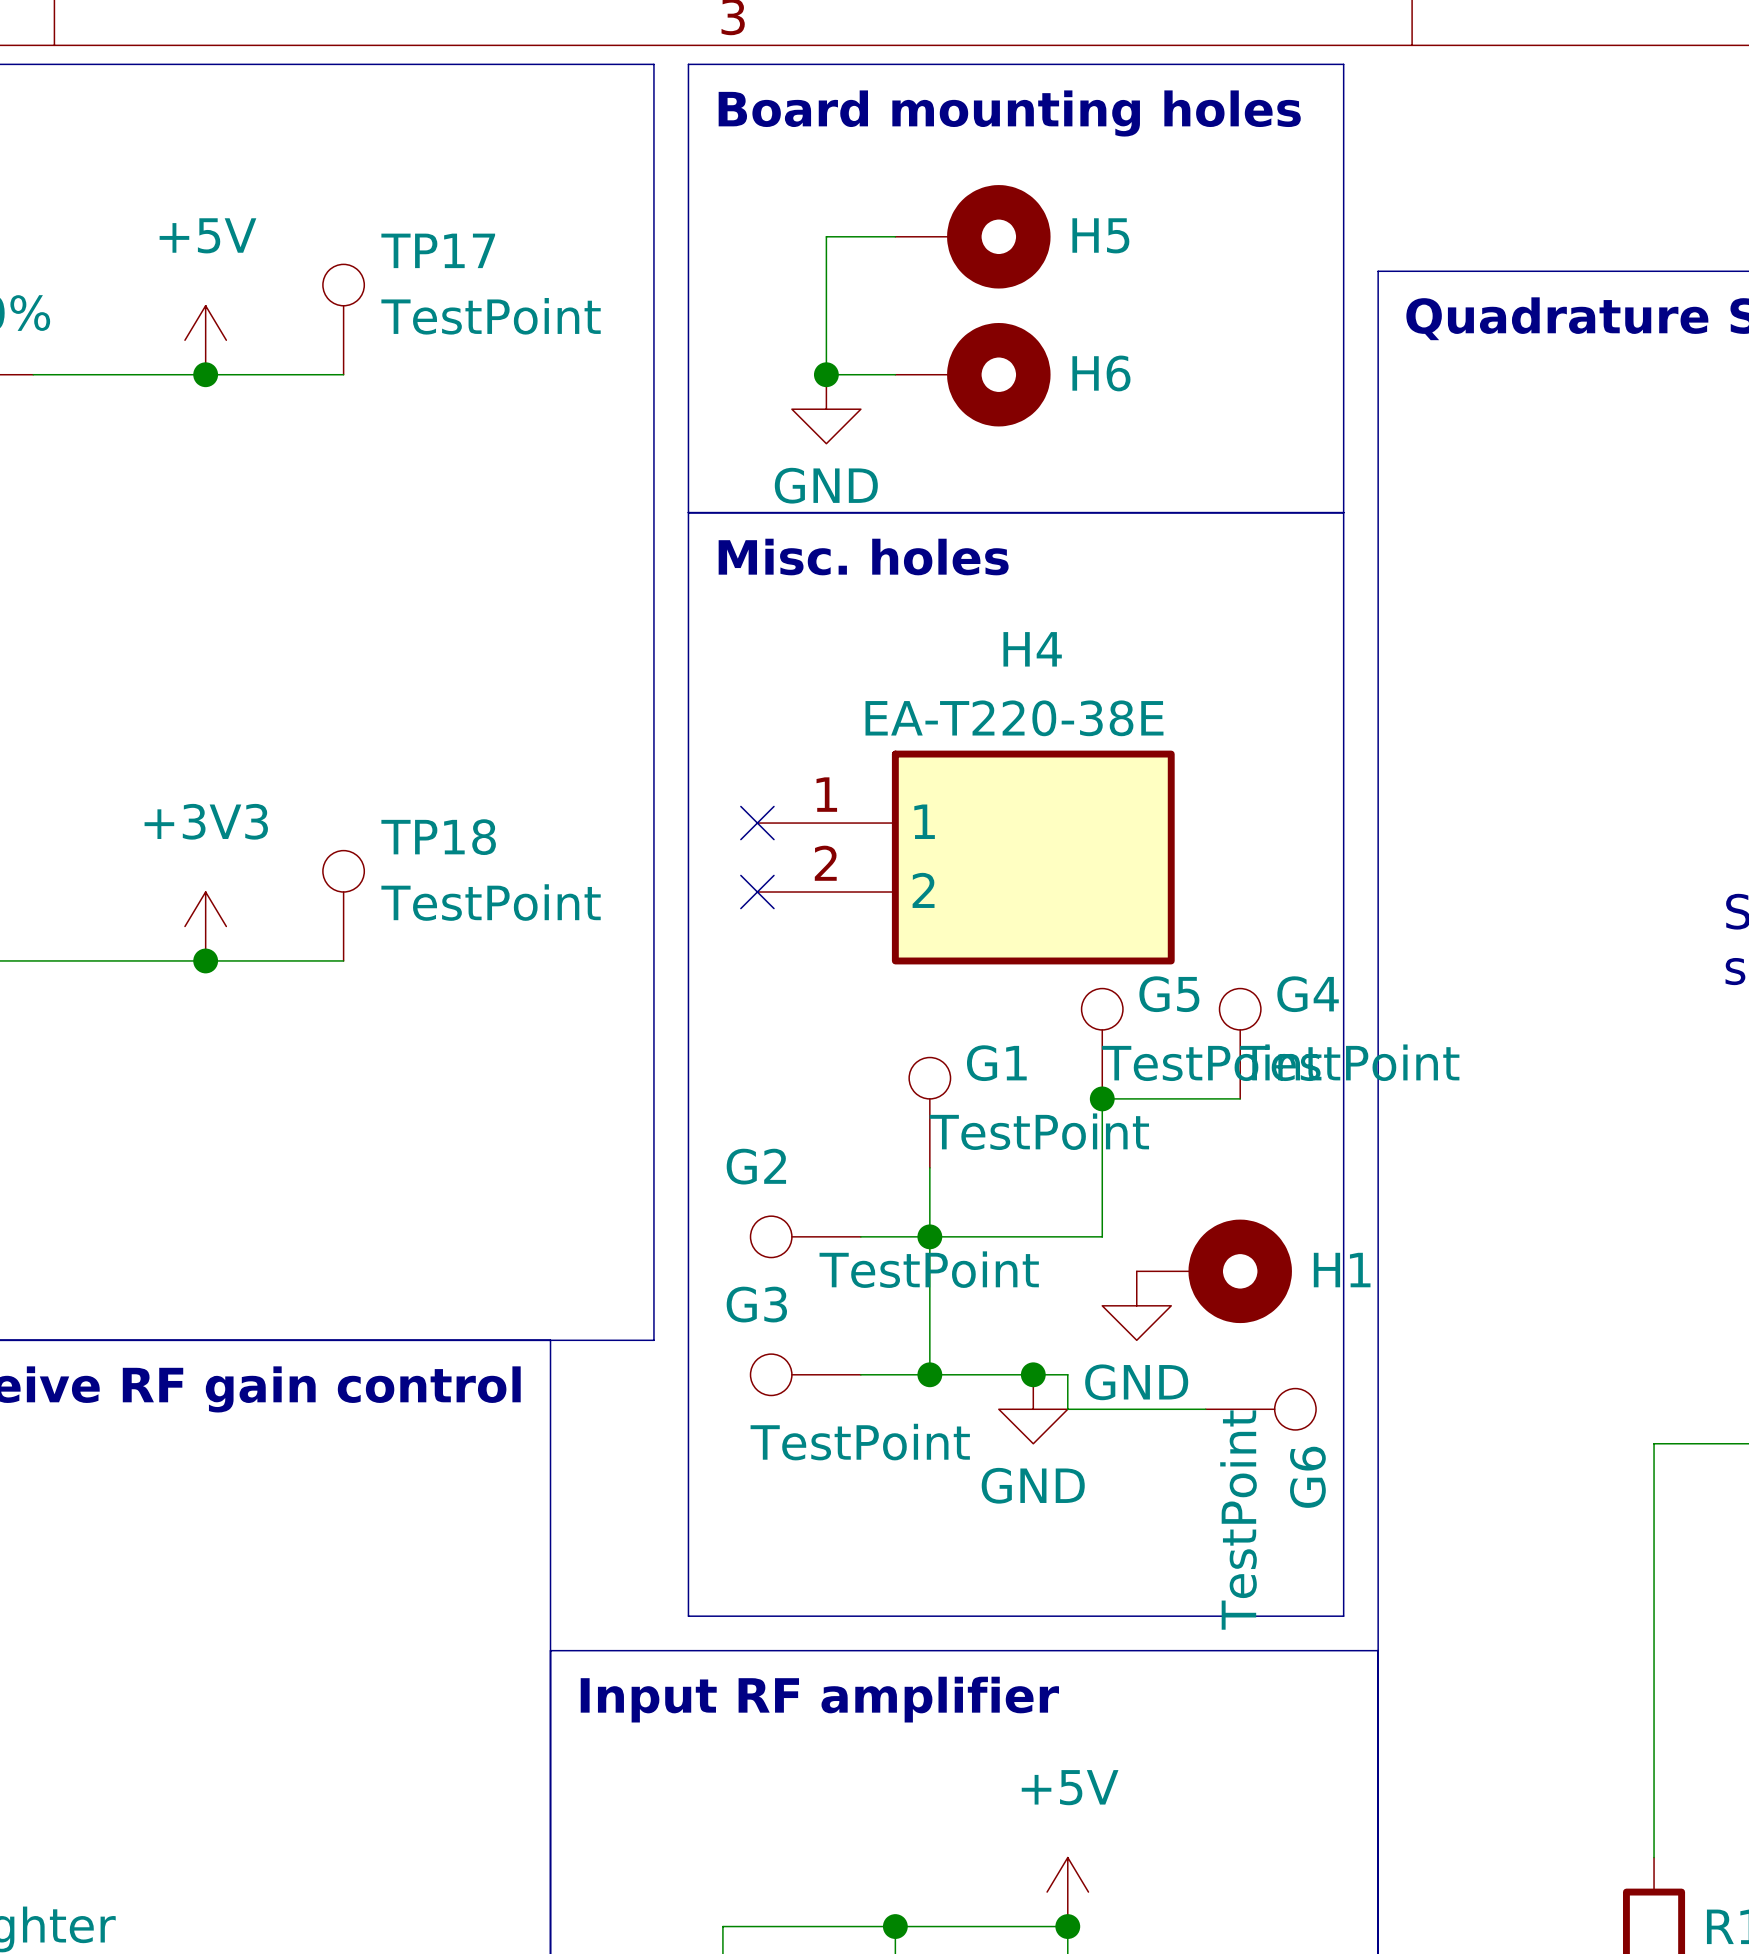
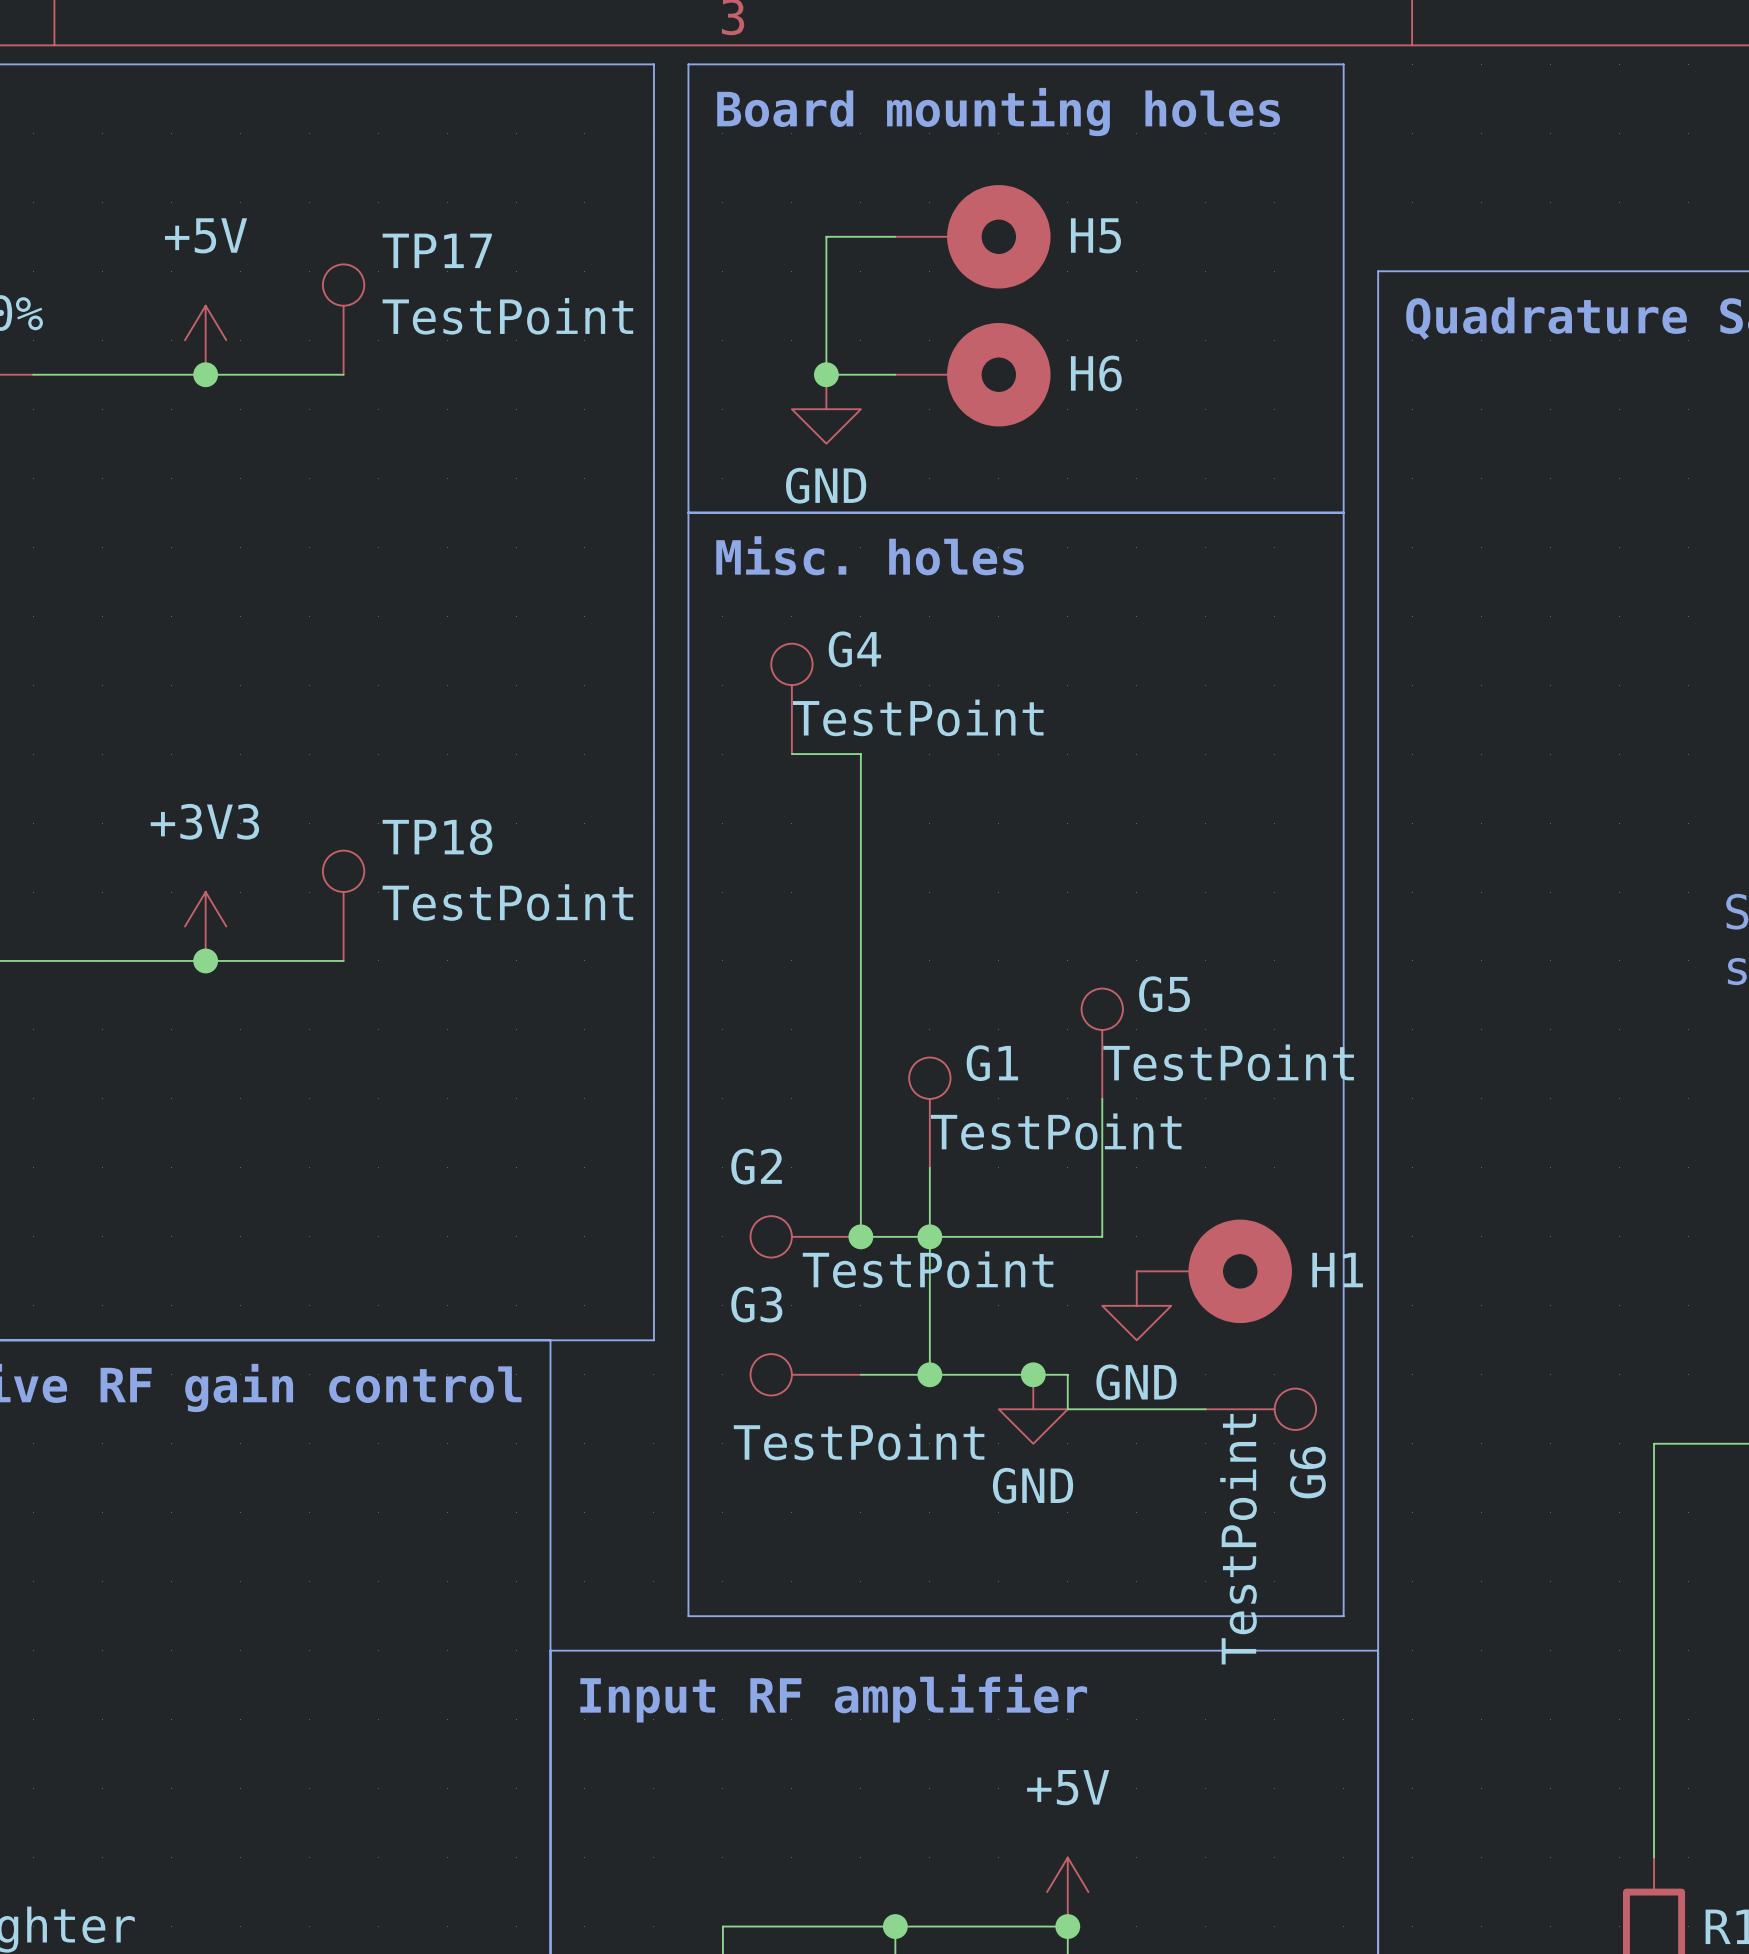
wire: none -> (791, 754) (860, 754) (860, 1236)
no-connect mark: (757, 823) -> none
H4: EA-T220-38E (966, 857) -> none
no-connect mark: (757, 892) -> none
G4 position: (1240, 1043) -> (791, 698)
wire: (1102, 1098) (1240, 1098) -> none
junction: (1102, 1098) -> none
junction: none -> (860, 1236)

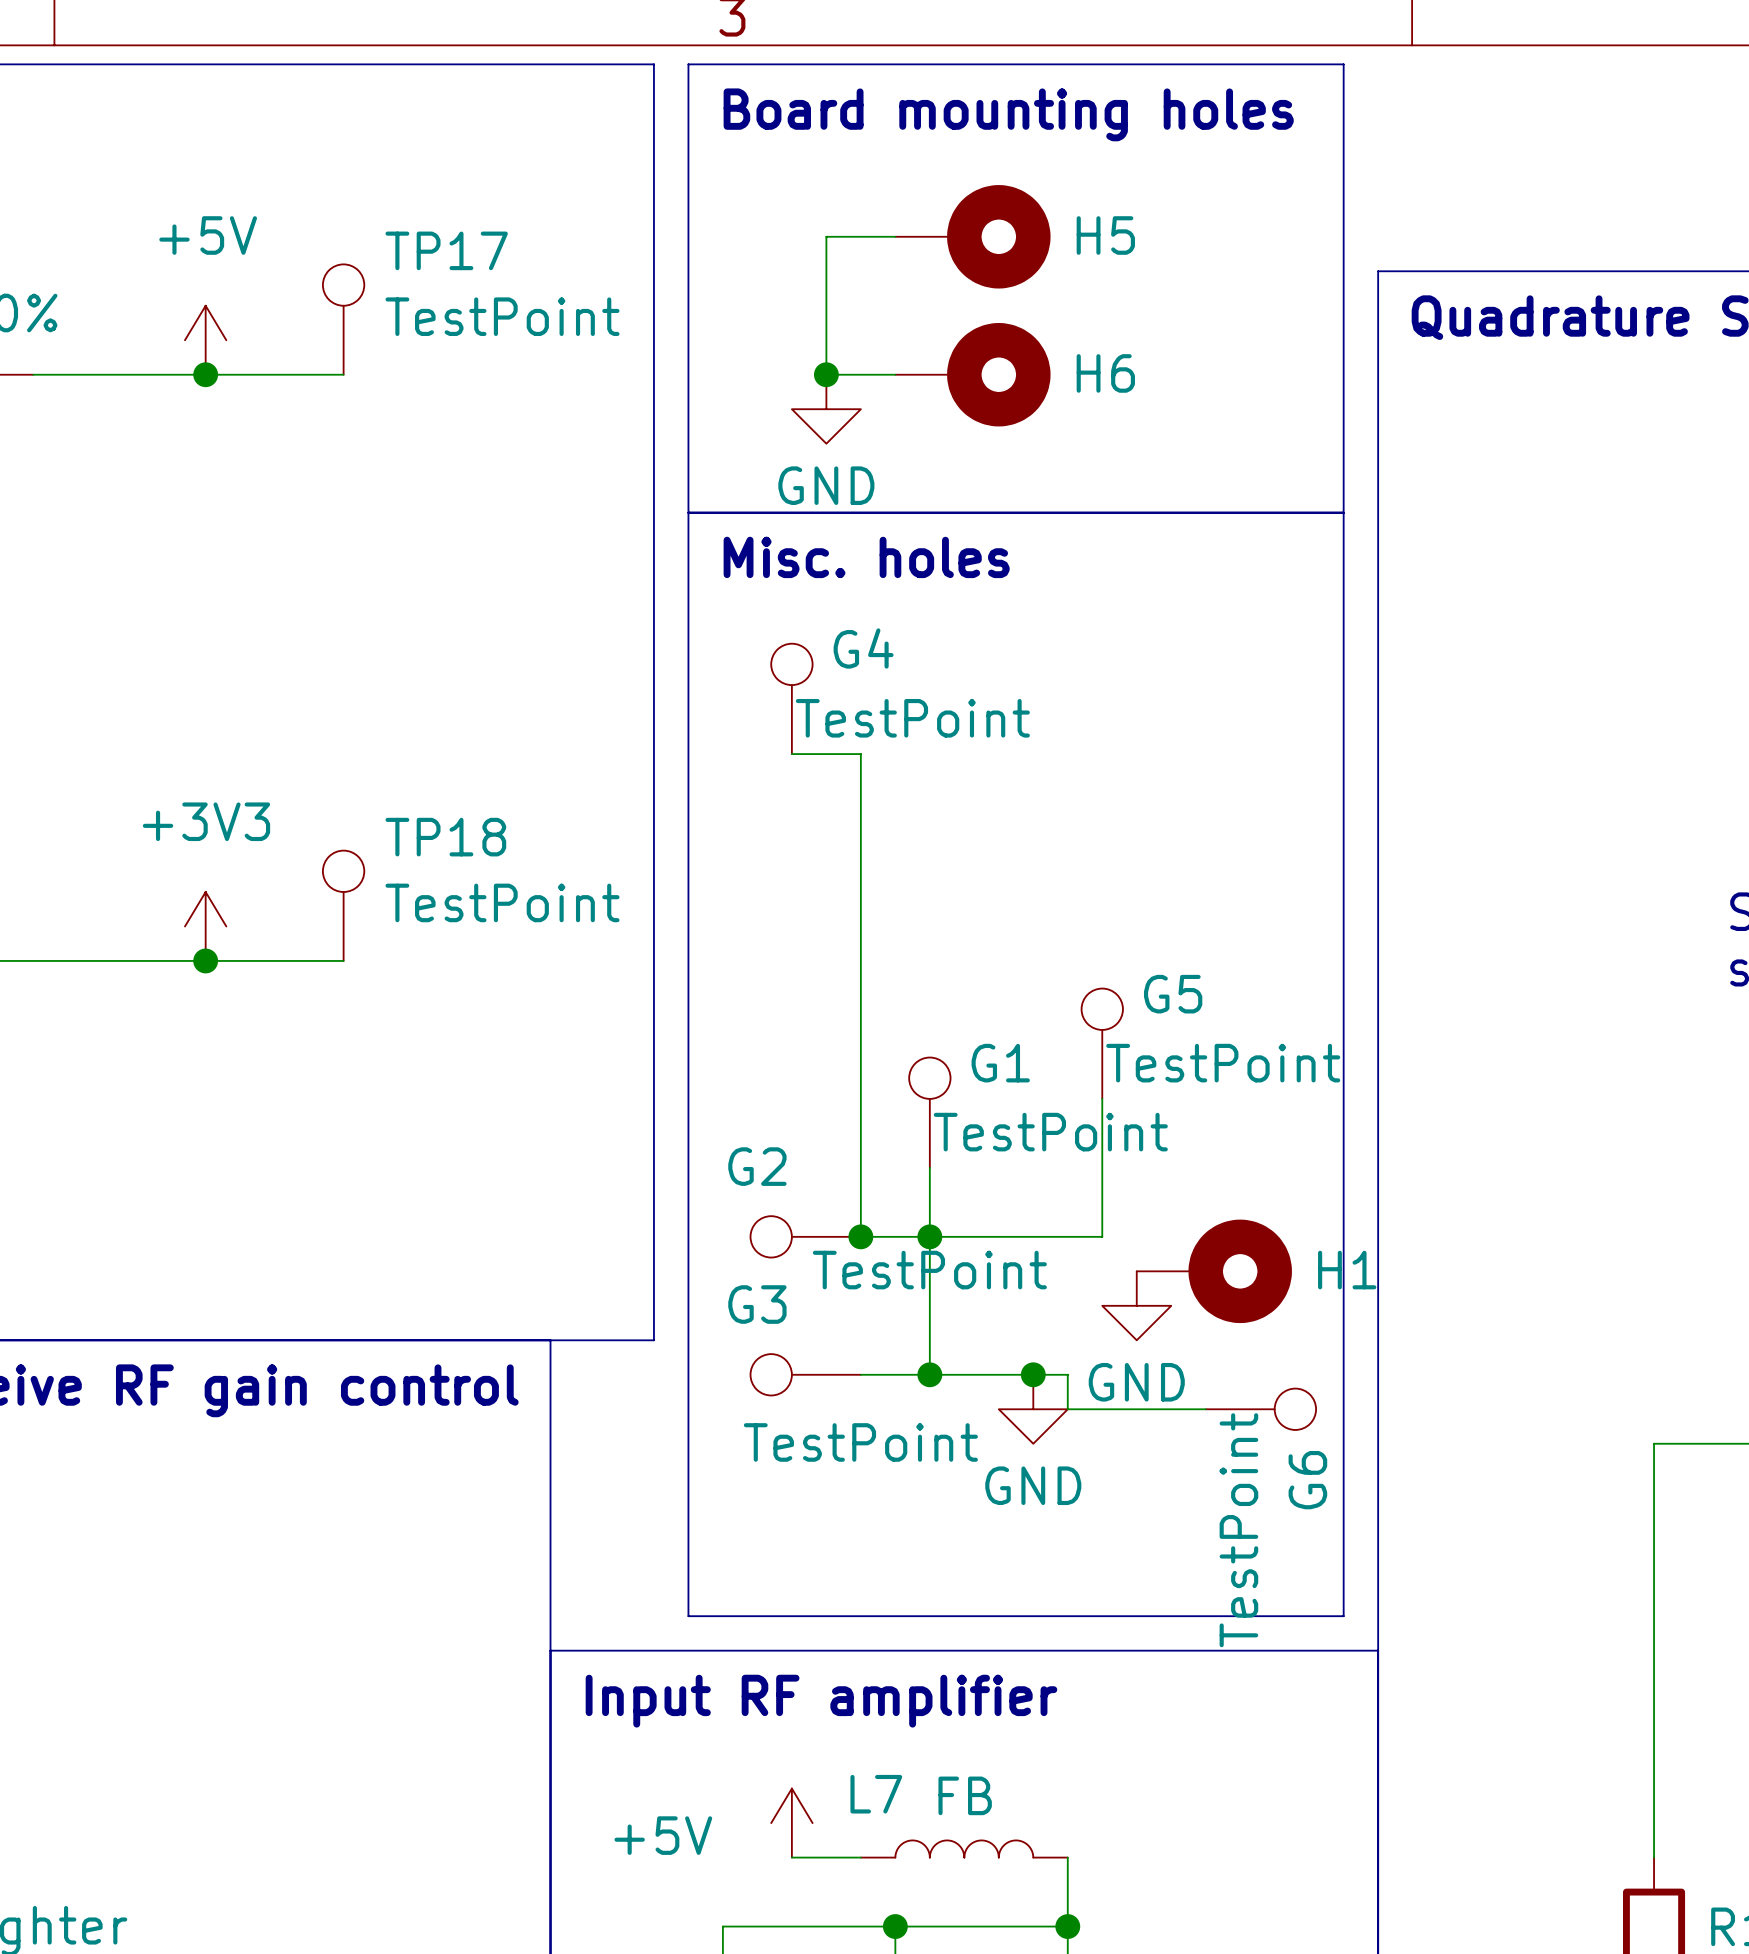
power symbol text position: +5V (1068, 1787) -> +5V (663, 1835)
L7: none -> FB (964, 1848)
wire: none -> (791, 1857) (860, 1857)
power symbol position: +5V (1067, 1892) -> +5V (791, 1823)

